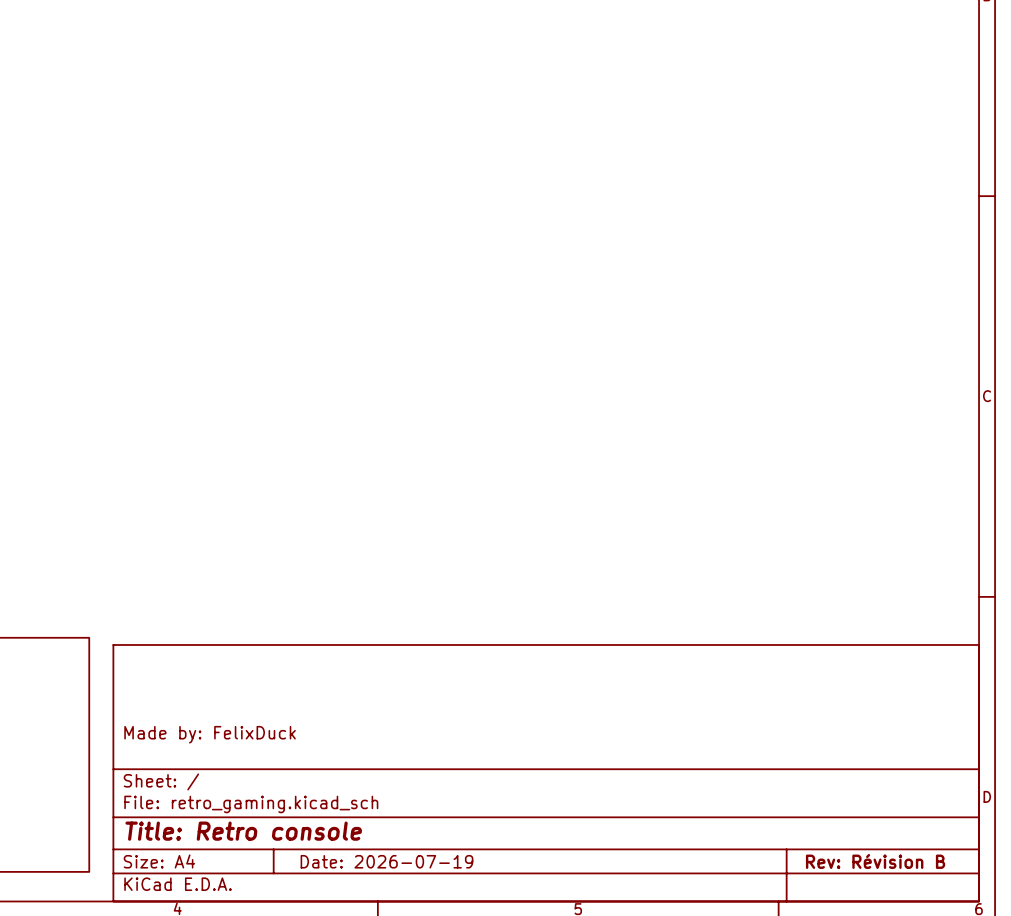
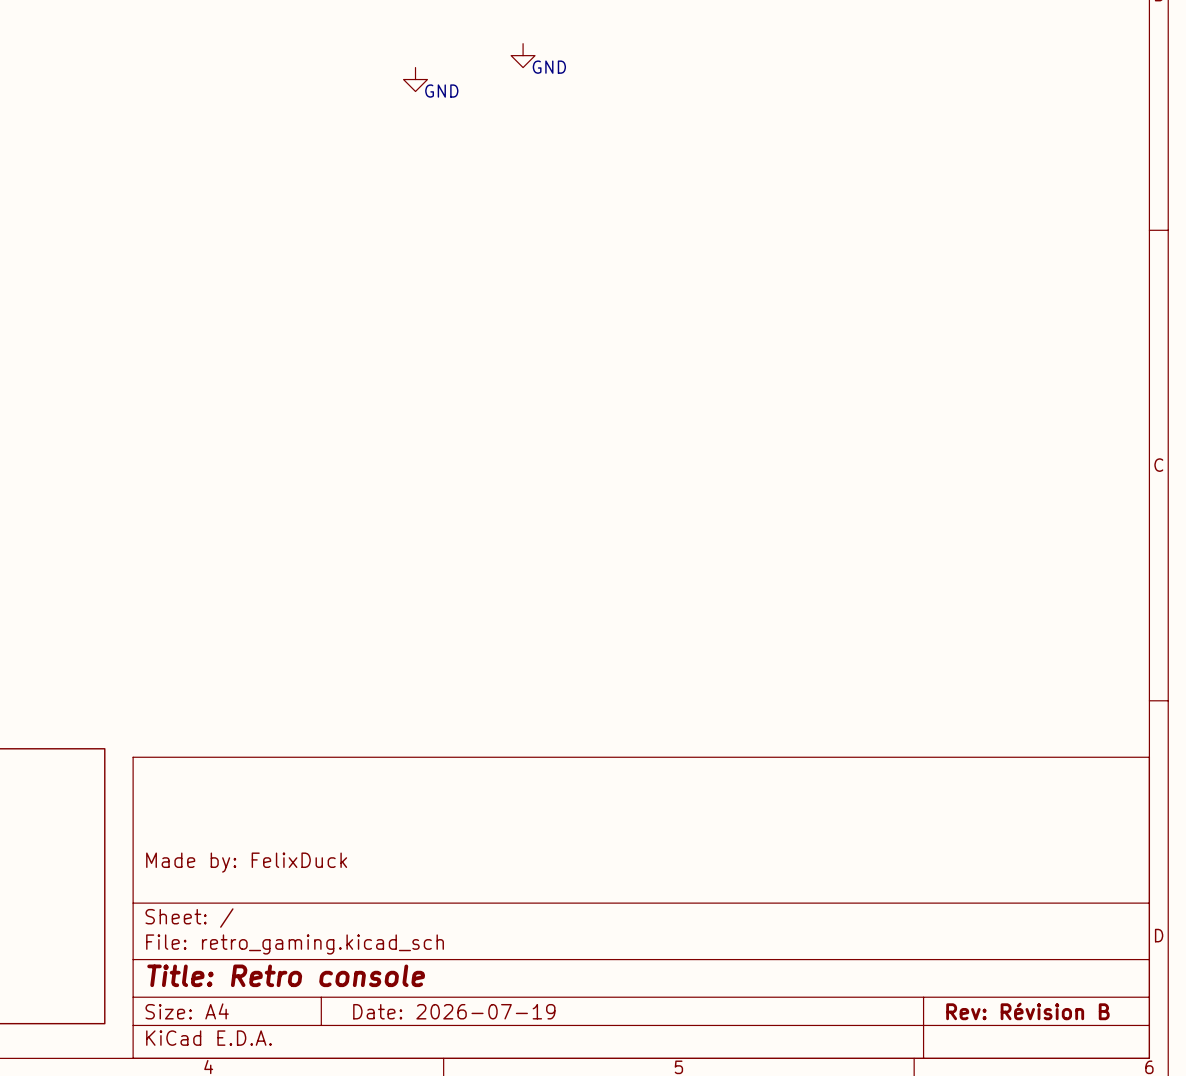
power symbol: none -> GND (523, 55)
power symbol: none -> GND (415, 79)

